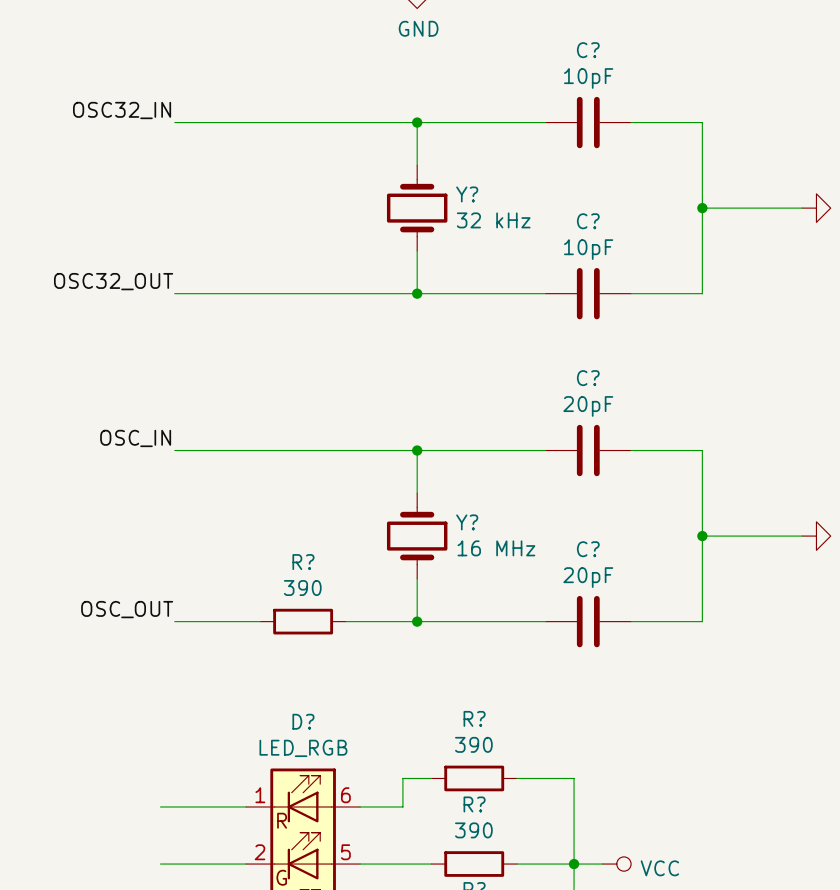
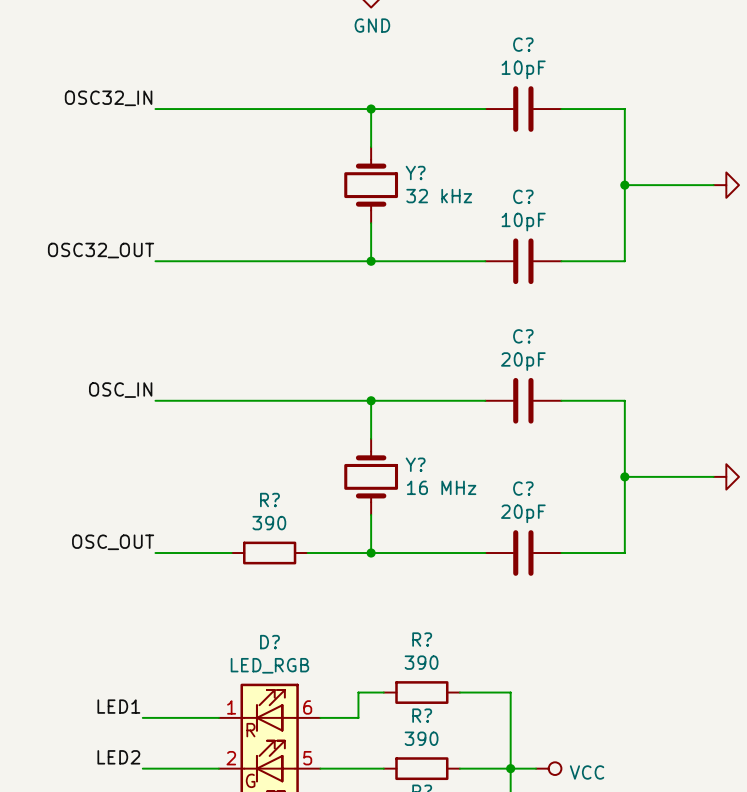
label: none -> LED1 (118, 706)
label: none -> LED2 (118, 757)

